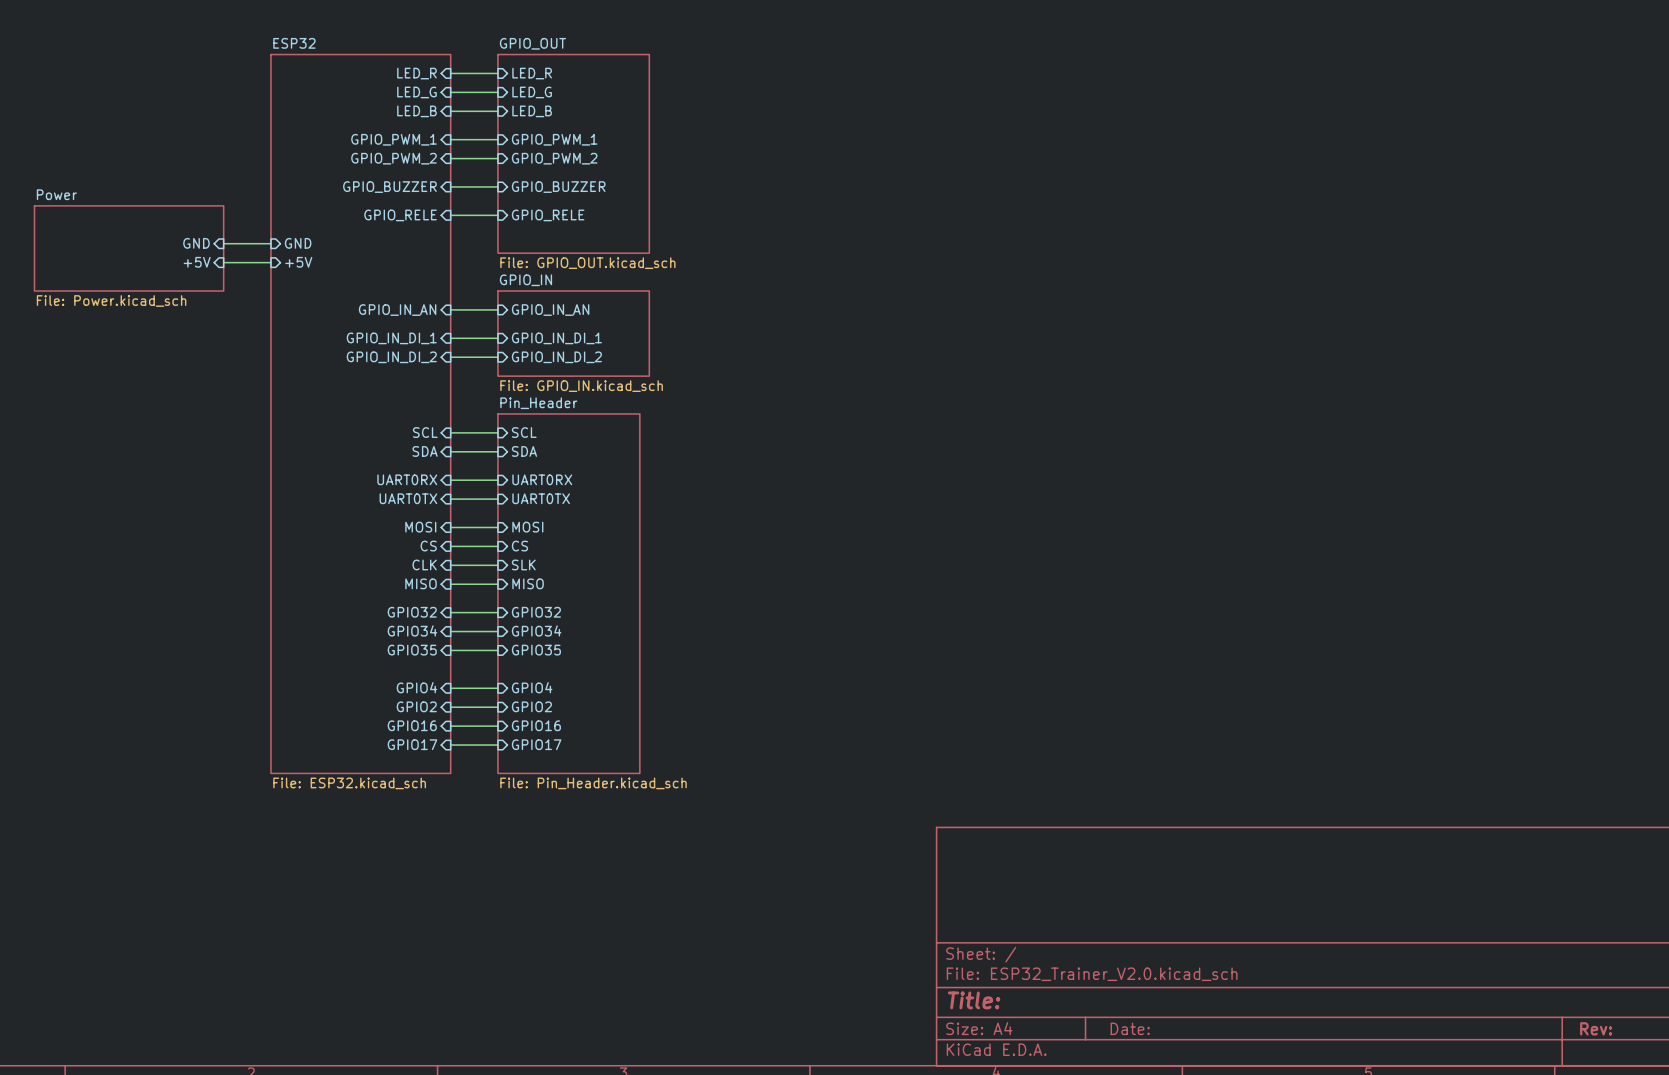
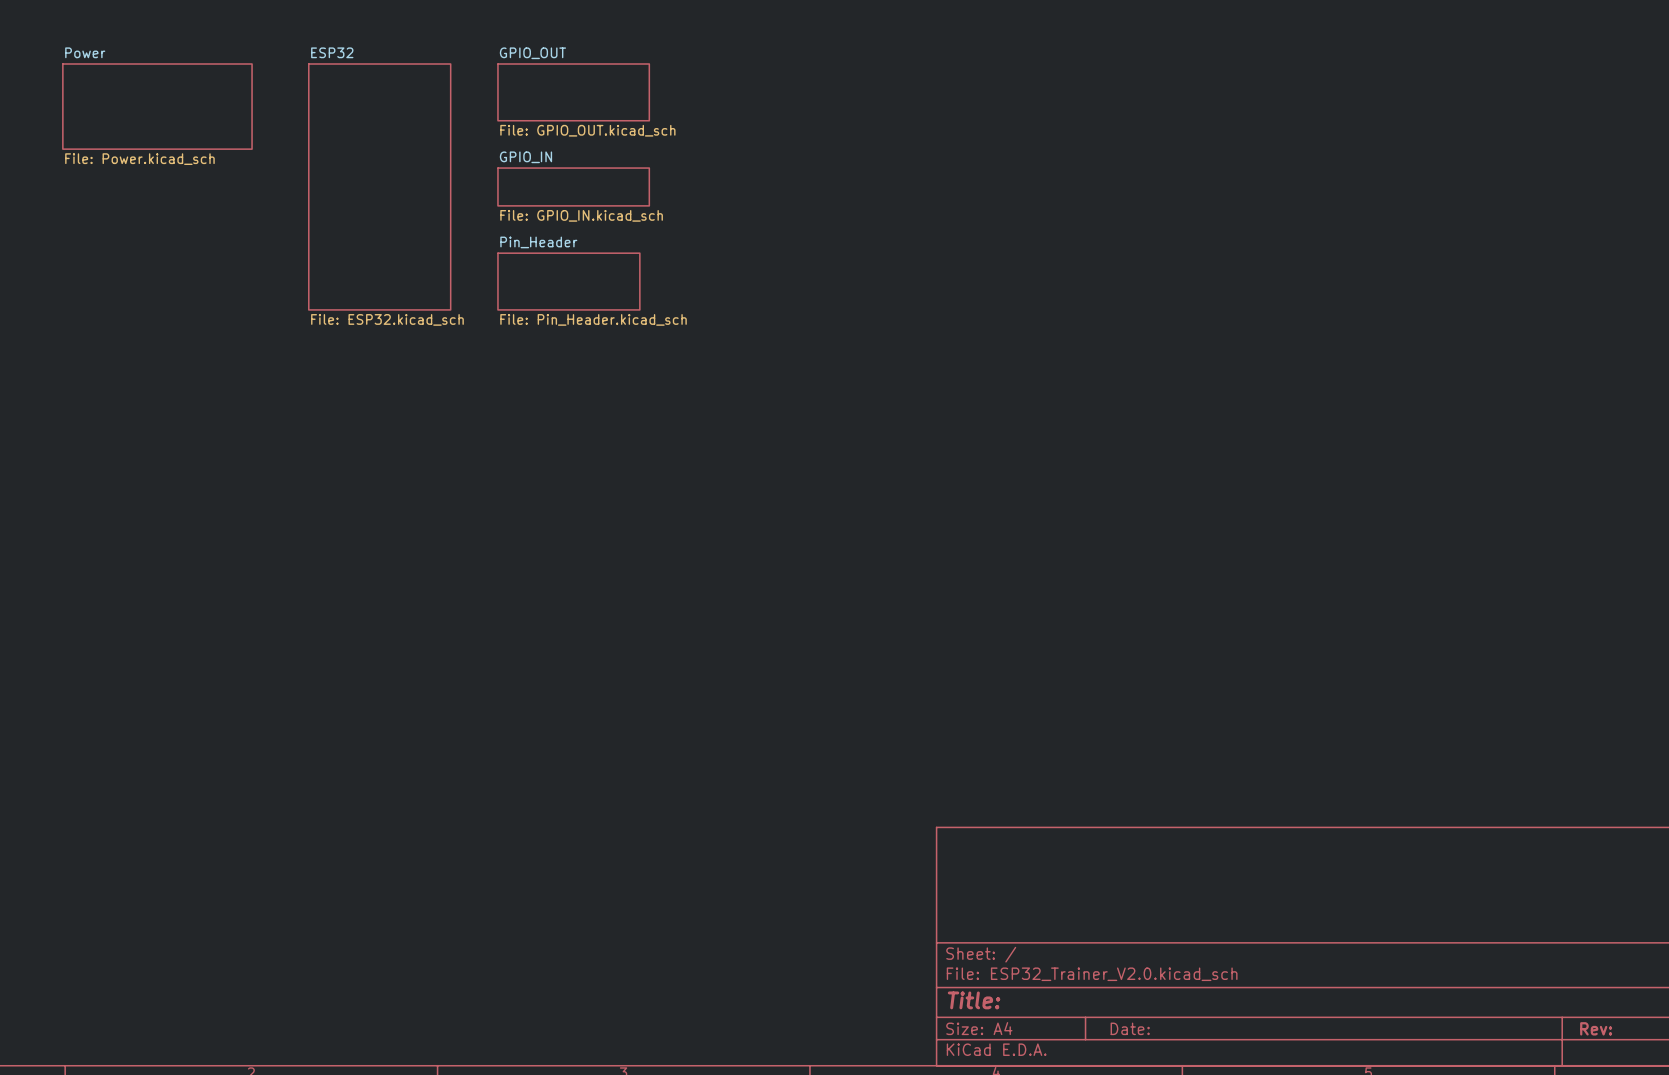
sheet ESP32 name position: ESP32 (294, 43) -> ESP32 (332, 52)
sheet ESP32 shape: [270, 53, 452, 774] -> [308, 63, 452, 311]
sheet pin: LED_R (416, 73) -> none
wire: (450, 73) (497, 73) -> none
sheet pin: LED_R (532, 73) -> none
sheet pin: LED_G (416, 92) -> none
wire: (450, 92) (497, 92) -> none
sheet pin: LED_G (532, 92) -> none
sheet GPIO_OUT: none -> File: GPIO_OUT.kicad_sch (573, 92)
sheet pin: LED_B (416, 111) -> none
wire: (450, 111) (497, 111) -> none
sheet pin: LED_B (532, 111) -> none
sheet pin: GPIO_PWM_1 (394, 139) -> none
wire: (450, 139) (497, 139) -> none
sheet pin: GPIO_PWM_1 (554, 139) -> none
sheet GPIO_OUT: File: GPIO_OUT.kicad_sch (573, 153) -> none
sheet pin: GPIO_PWM_2 (394, 158) -> none
wire: (450, 158) (497, 158) -> none
sheet pin: GPIO_PWM_2 (554, 158) -> none
wire: (450, 186) (497, 186) -> none
sheet GPIO_IN: none -> File: GPIO_IN.kicad_sch (573, 186)
sheet pin: GPIO_BUZZER (389, 187) -> none
sheet pin: GPIO_BUZZER (558, 187) -> none
sheet pin: GPIO_RELE (400, 215) -> none
wire: (450, 215) (497, 215) -> none
sheet pin: GPIO_RELE (548, 215) -> none
sheet pin: GND (196, 243) -> none
wire: (223, 243) (270, 243) -> none
sheet pin: GND (298, 243) -> none
sheet Power position: (129, 248) -> (157, 106)
sheet pin: +5V (197, 262) -> none
wire: (223, 262) (270, 262) -> none
sheet pin: +5V (298, 262) -> none
sheet Pin_Header: none -> File: Pin_Header.kicad_sch (568, 281)
wire: (450, 309) (497, 309) -> none
sheet pin: GPIO_IN_AN (397, 310) -> none
sheet pin: GPIO_IN_AN (550, 310) -> none
sheet GPIO_IN: File: GPIO_IN.kicad_sch (573, 333) -> none
sheet pin: GPIO_IN_DI_1 (391, 338) -> none
wire: (450, 338) (497, 338) -> none
sheet pin: GPIO_IN_DI_1 (556, 338) -> none
sheet pin: GPIO_IN_DI_2 (391, 357) -> none
wire: (450, 357) (497, 357) -> none
sheet pin: GPIO_IN_DI_2 (556, 357) -> none
sheet pin: SCL (425, 432) -> none
wire: (450, 432) (497, 432) -> none
sheet pin: SCL (524, 432) -> none
sheet pin: SDA (425, 451) -> none
wire: (450, 451) (497, 451) -> none
sheet pin: SDA (524, 451) -> none
sheet pin: UART0RX (407, 479) -> none
sheet pin: UART0RX (542, 479) -> none
wire: (450, 480) (497, 480) -> none
sheet pin: UART0TX (408, 498) -> none
sheet pin: UART0TX (541, 498) -> none
wire: (450, 499) (497, 499) -> none
sheet pin: MOSI (420, 527) -> none
wire: (450, 527) (497, 527) -> none
sheet pin: MOSI (527, 527) -> none
sheet pin: CS (428, 546) -> none
wire: (450, 546) (497, 546) -> none
sheet pin: CS (519, 546) -> none
sheet pin: CLK (424, 564) -> none
sheet pin: SLK (523, 564) -> none
wire: (450, 565) (497, 565) -> none
sheet pin: MISO (421, 583) -> none
sheet pin: MISO (528, 583) -> none
wire: (450, 584) (497, 584) -> none
sheet Pin_Header: File: Pin_Header.kicad_sch (568, 593) -> none
sheet pin: GPIO32 (412, 612) -> none
wire: (450, 612) (497, 612) -> none
sheet pin: GPIO32 (536, 612) -> none
sheet pin: GPIO34 (412, 630) -> none
sheet pin: GPIO34 (536, 630) -> none
wire: (450, 631) (497, 631) -> none
sheet pin: GPIO35 (412, 650) -> none
wire: (450, 650) (497, 650) -> none
sheet pin: GPIO35 (536, 650) -> none
sheet pin: GPIO4 (416, 687) -> none
sheet pin: GPIO4 (532, 687) -> none
wire: (450, 688) (497, 688) -> none
sheet pin: GPIO2 (416, 706) -> none
sheet pin: GPIO2 (531, 706) -> none
wire: (450, 707) (497, 707) -> none
sheet pin: GPIO16 (412, 725) -> none
sheet pin: GPIO16 (536, 725) -> none
wire: (450, 726) (497, 726) -> none
sheet pin: GPIO17 (412, 744) -> none
sheet pin: GPIO17 (536, 744) -> none
wire: (450, 745) (497, 745) -> none
sheet ESP32 value position: File: ESP32.kicad_sch (349, 783) -> File: ESP32.kicad_sch (387, 319)

